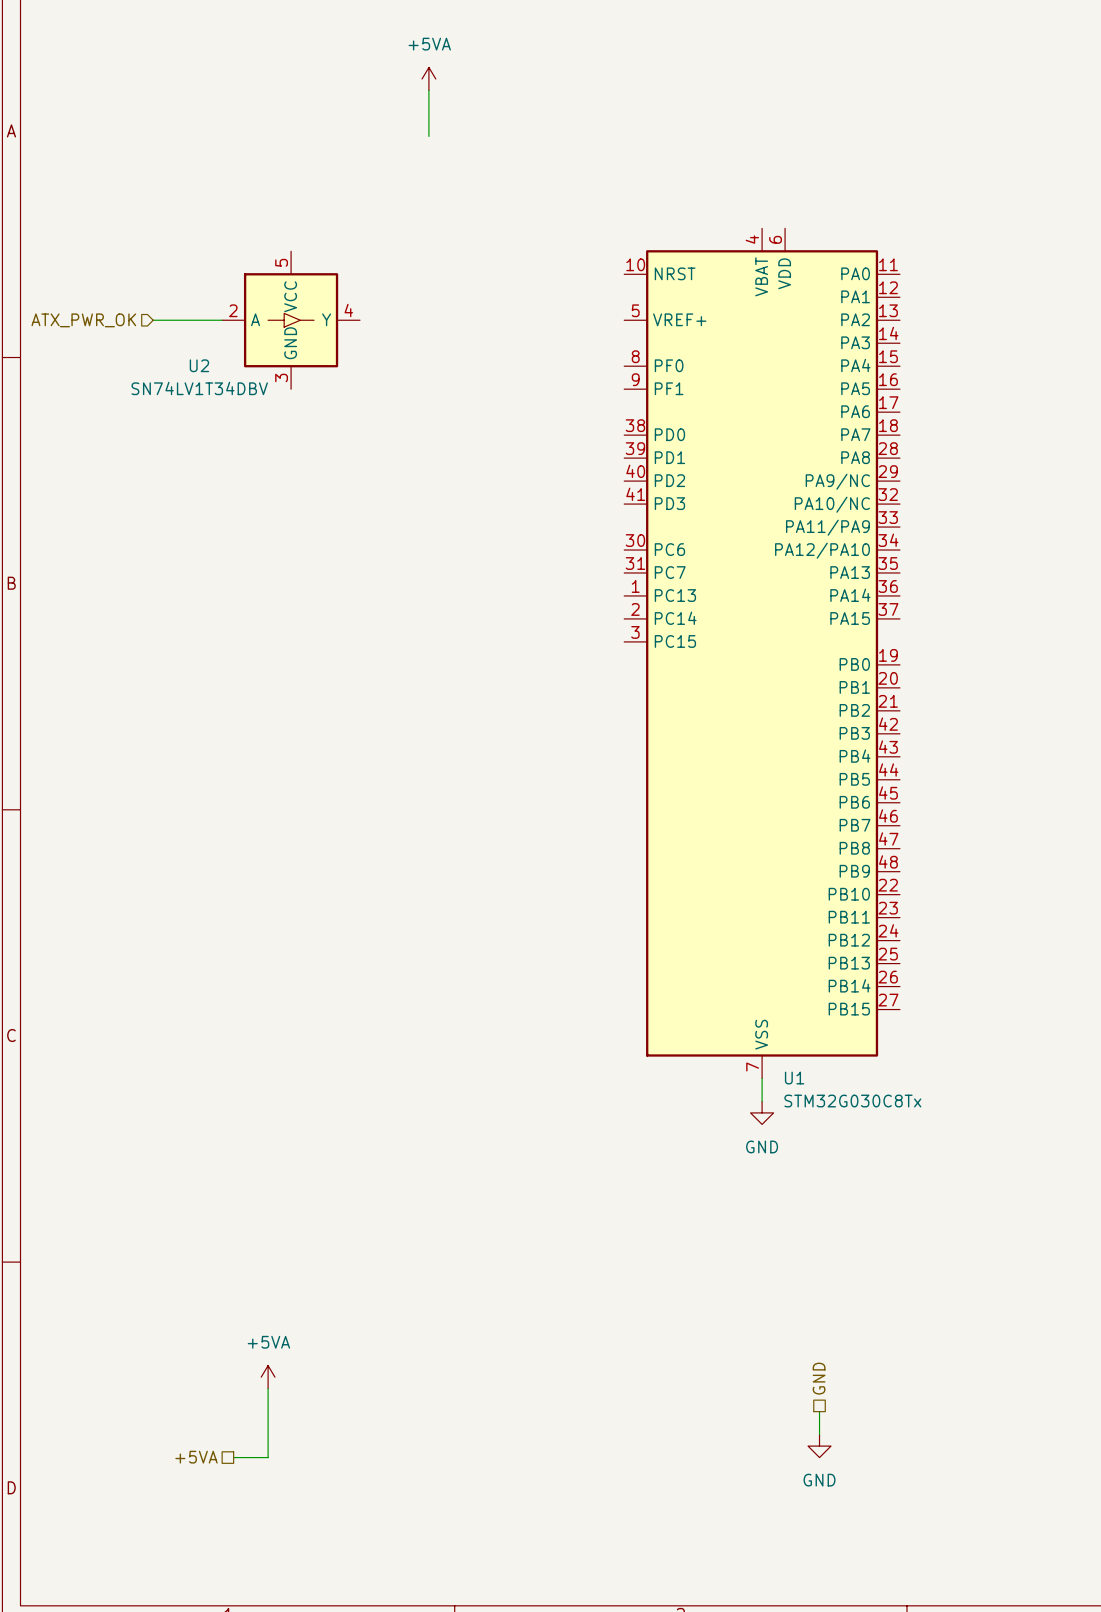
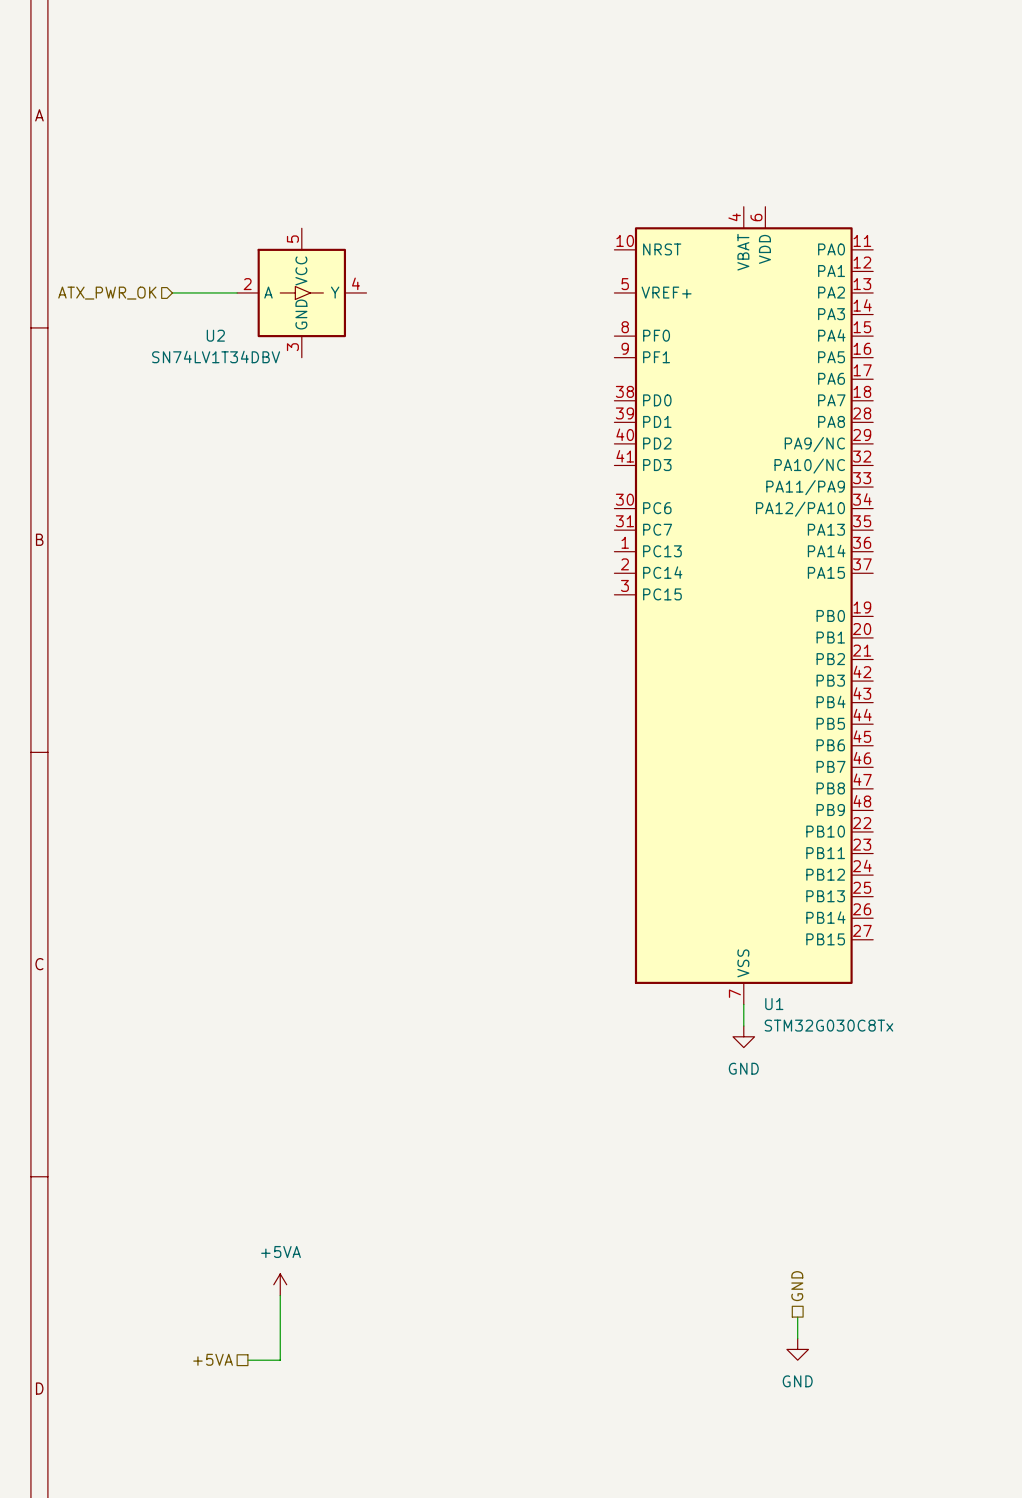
power symbol: +5VA (428, 79) -> none
wire: (428, 90) (428, 136) -> none

